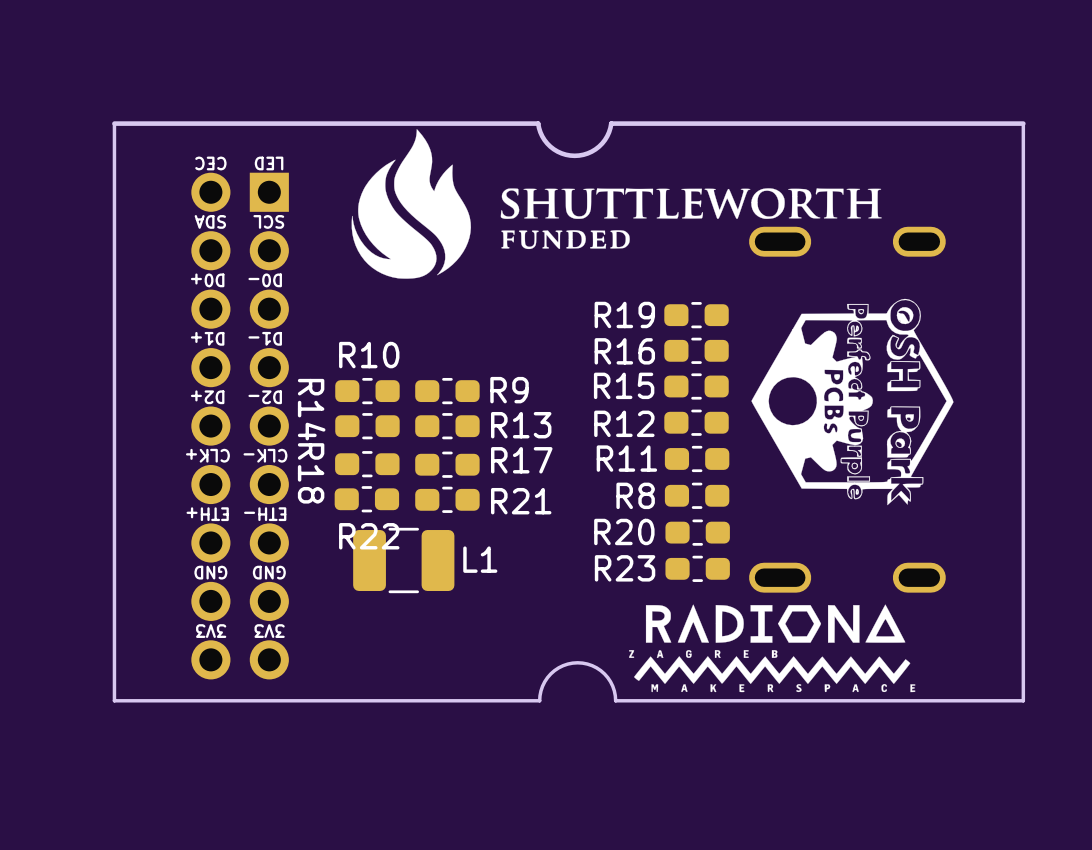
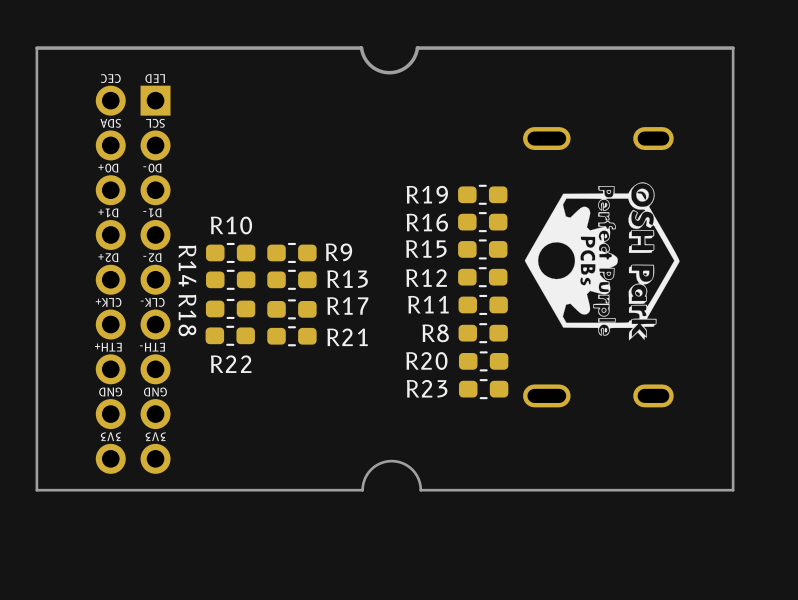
drawing: [351, 129, 882, 279] -> none
L1: (403, 560) -> none
drawing: [628, 604, 916, 693] -> none

